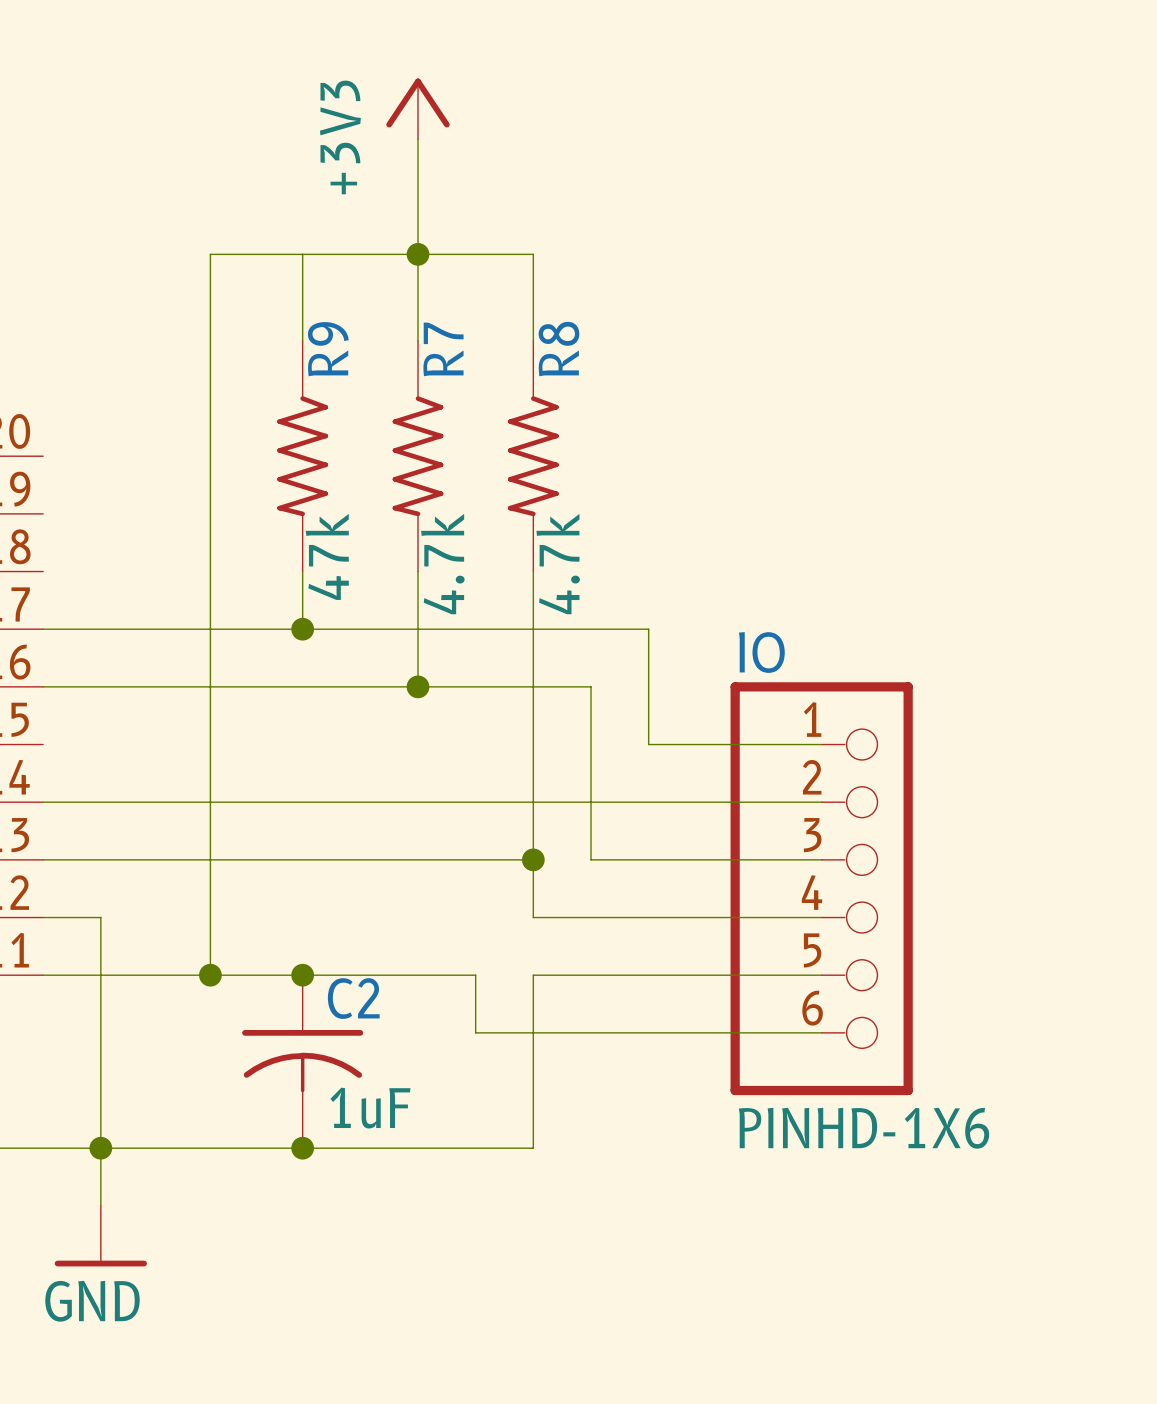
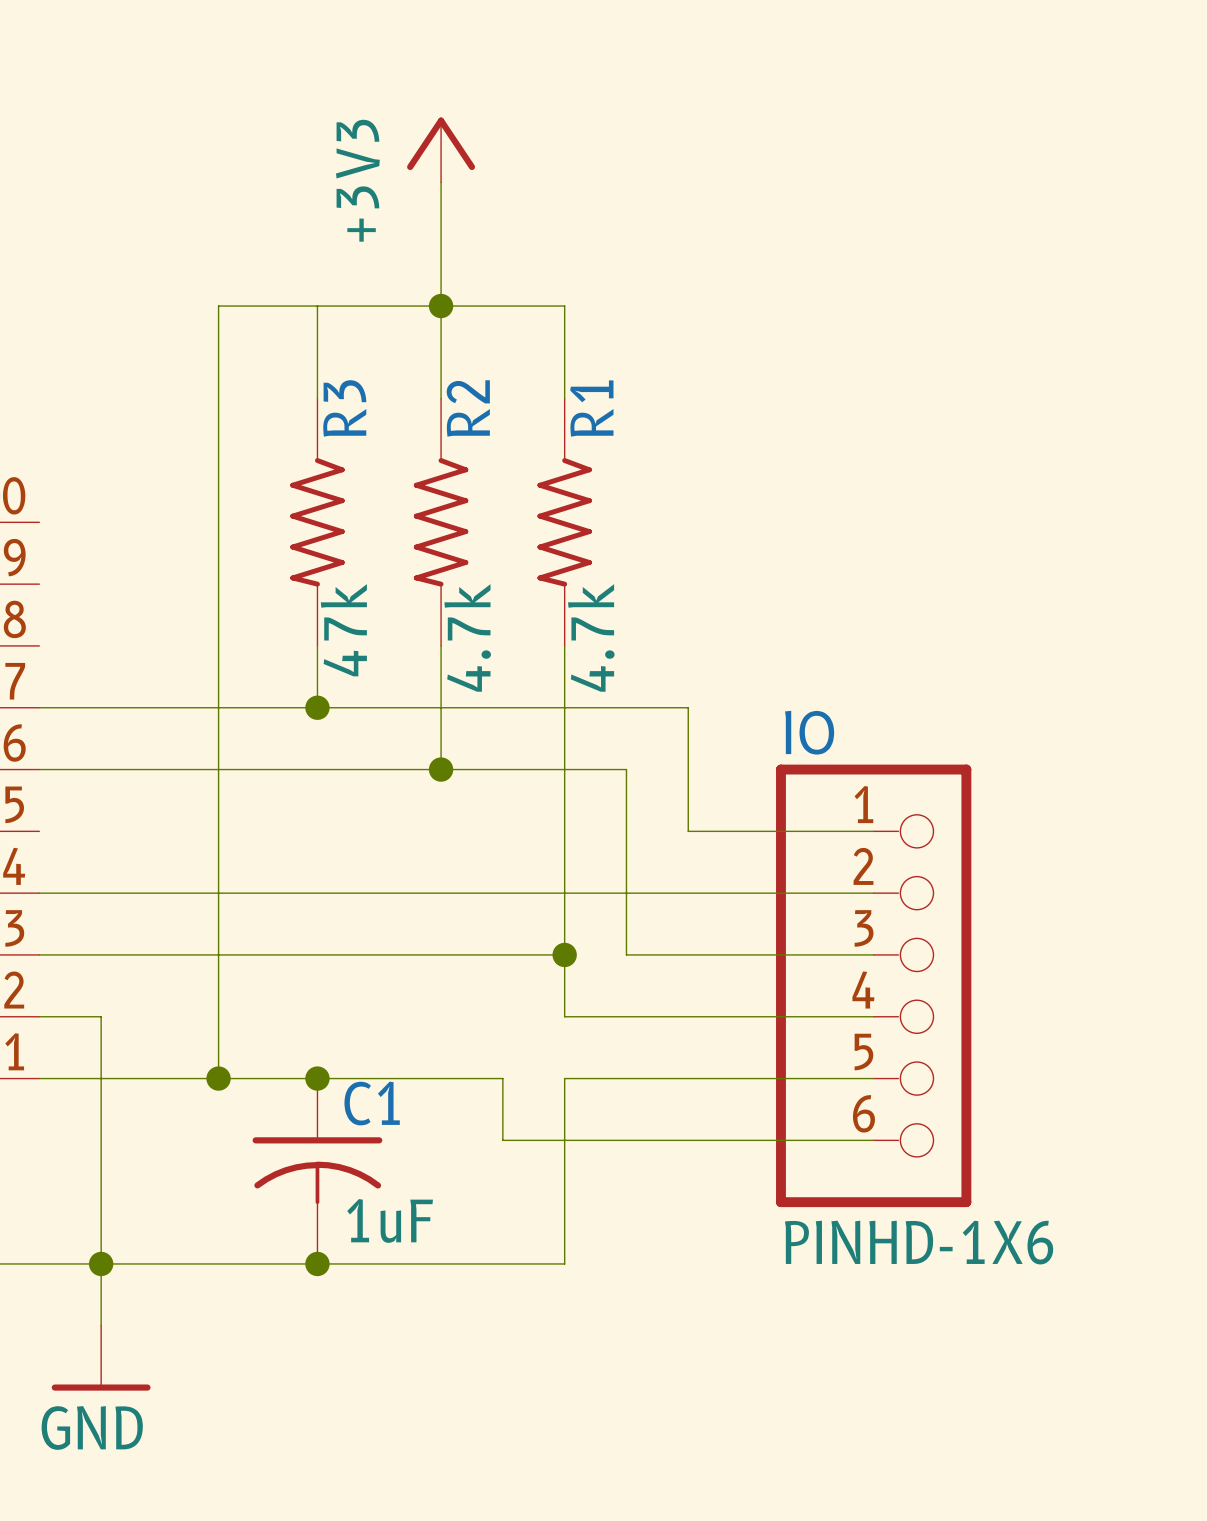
R9 name: R9 (328, 349) -> R3 (344, 408)
R7 name: R7 (443, 349) -> R2 (468, 408)
R8 name: R8 (558, 349) -> R1 (591, 408)
C2 name: C2 (353, 998) -> C1 (372, 1103)

